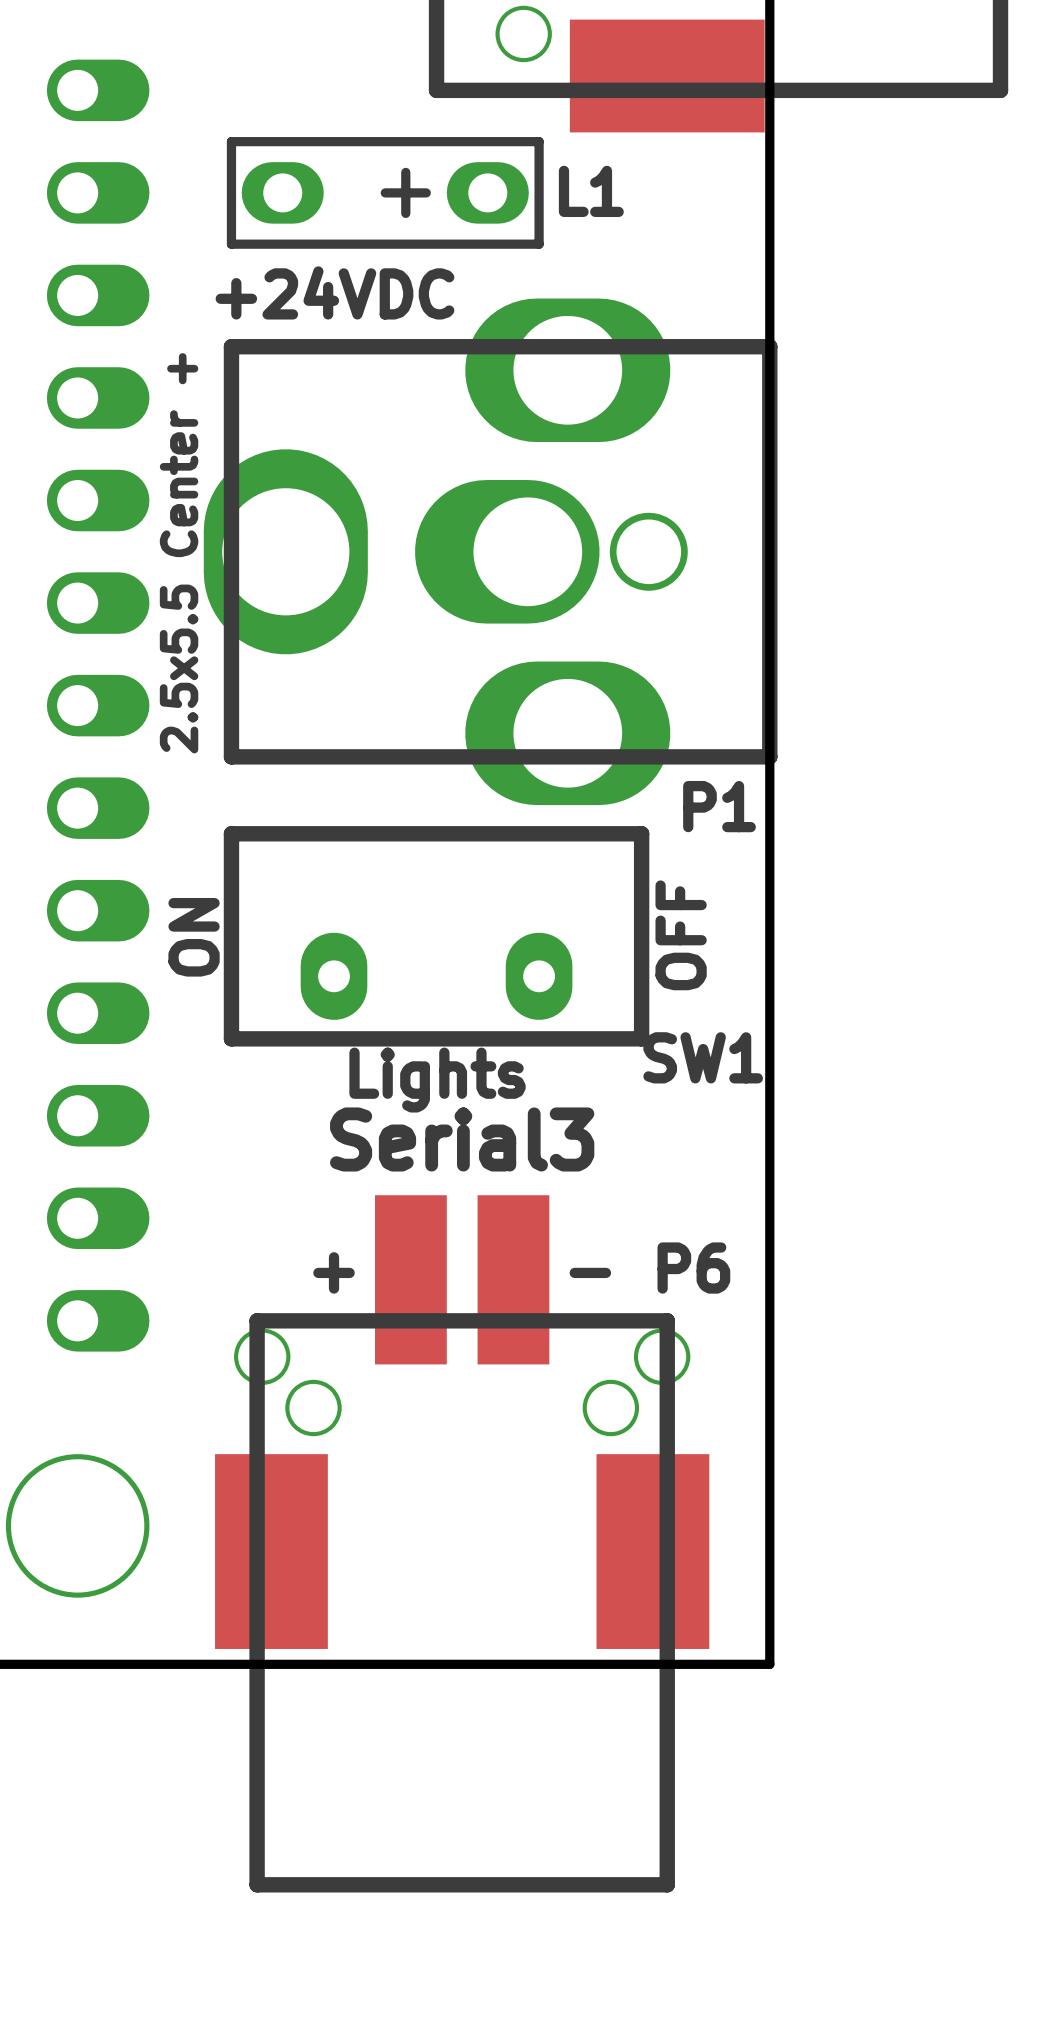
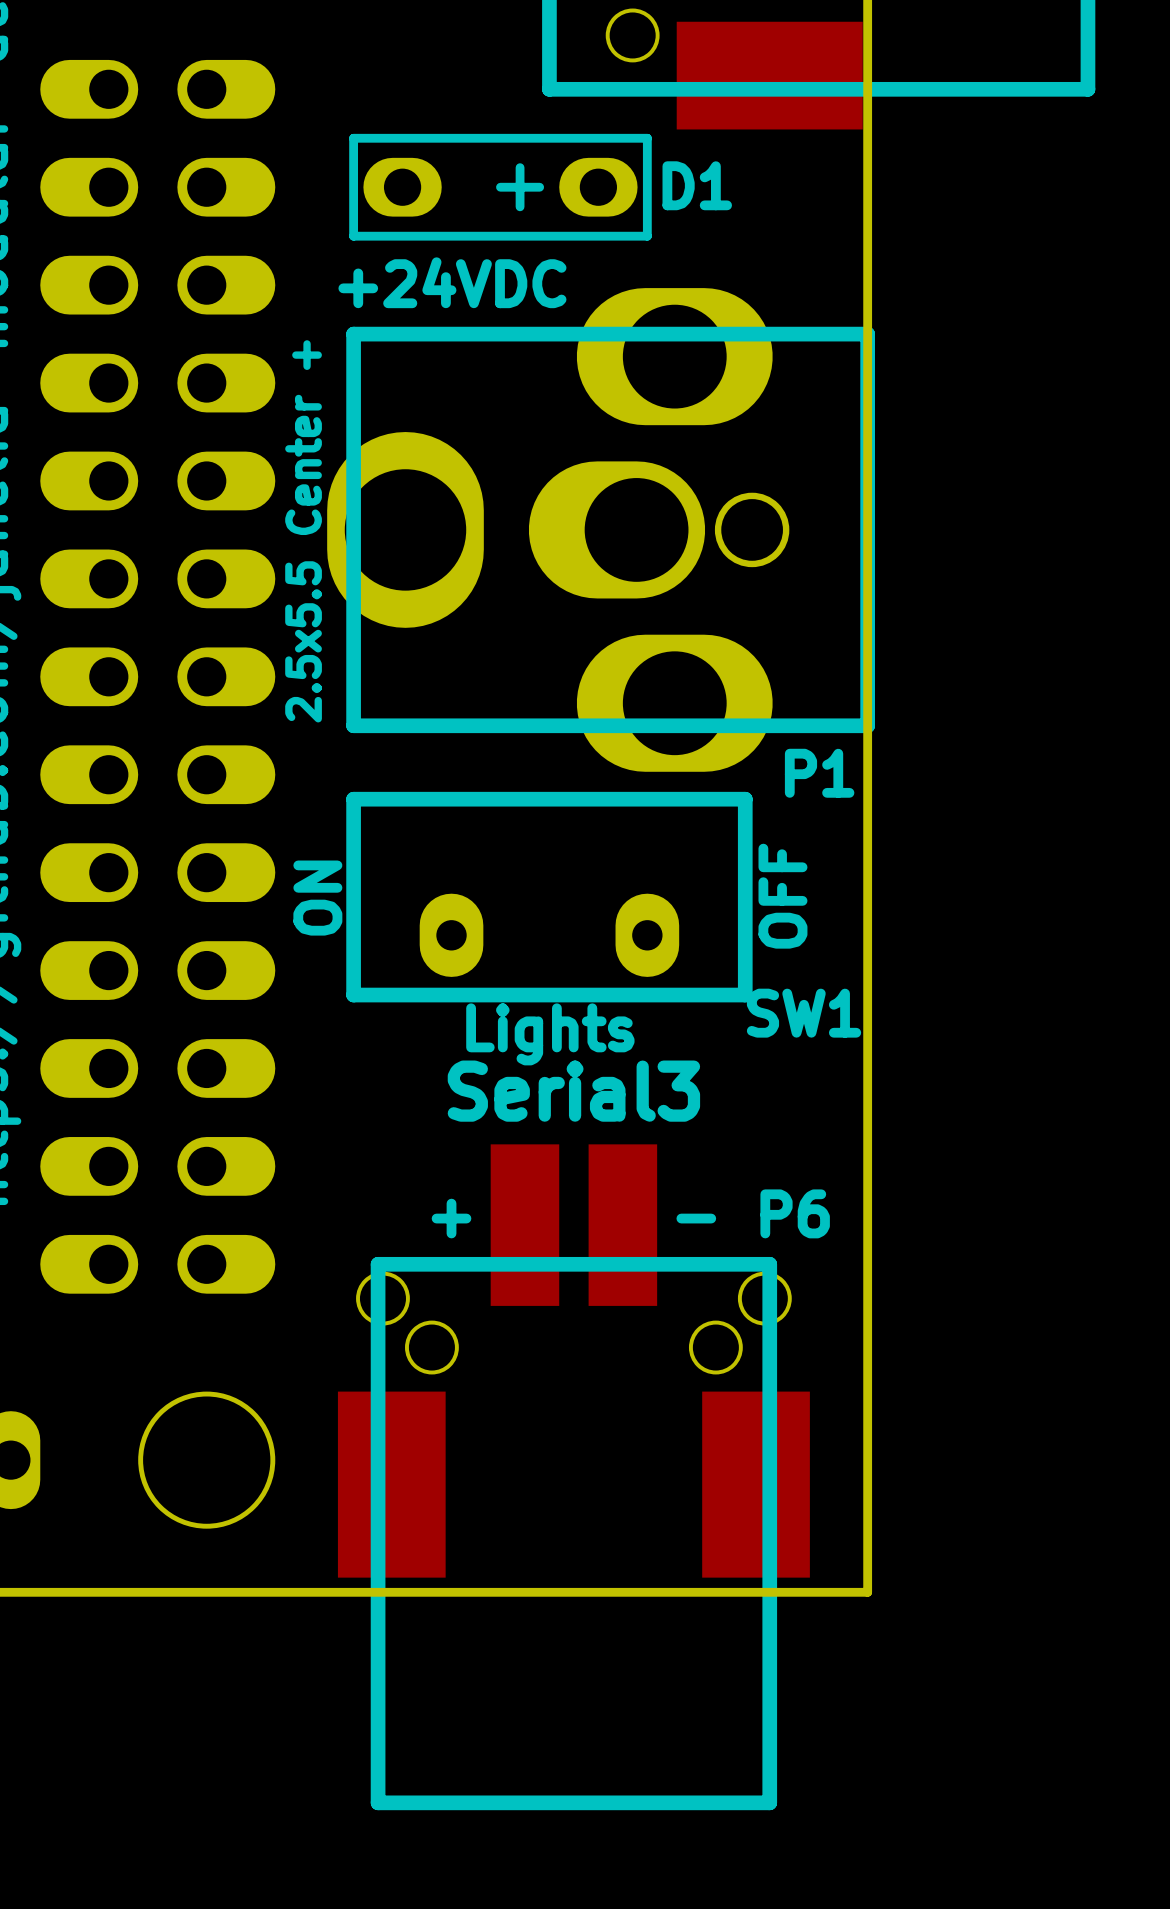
L1 name: L1 (591, 191) -> D1 (697, 185)

